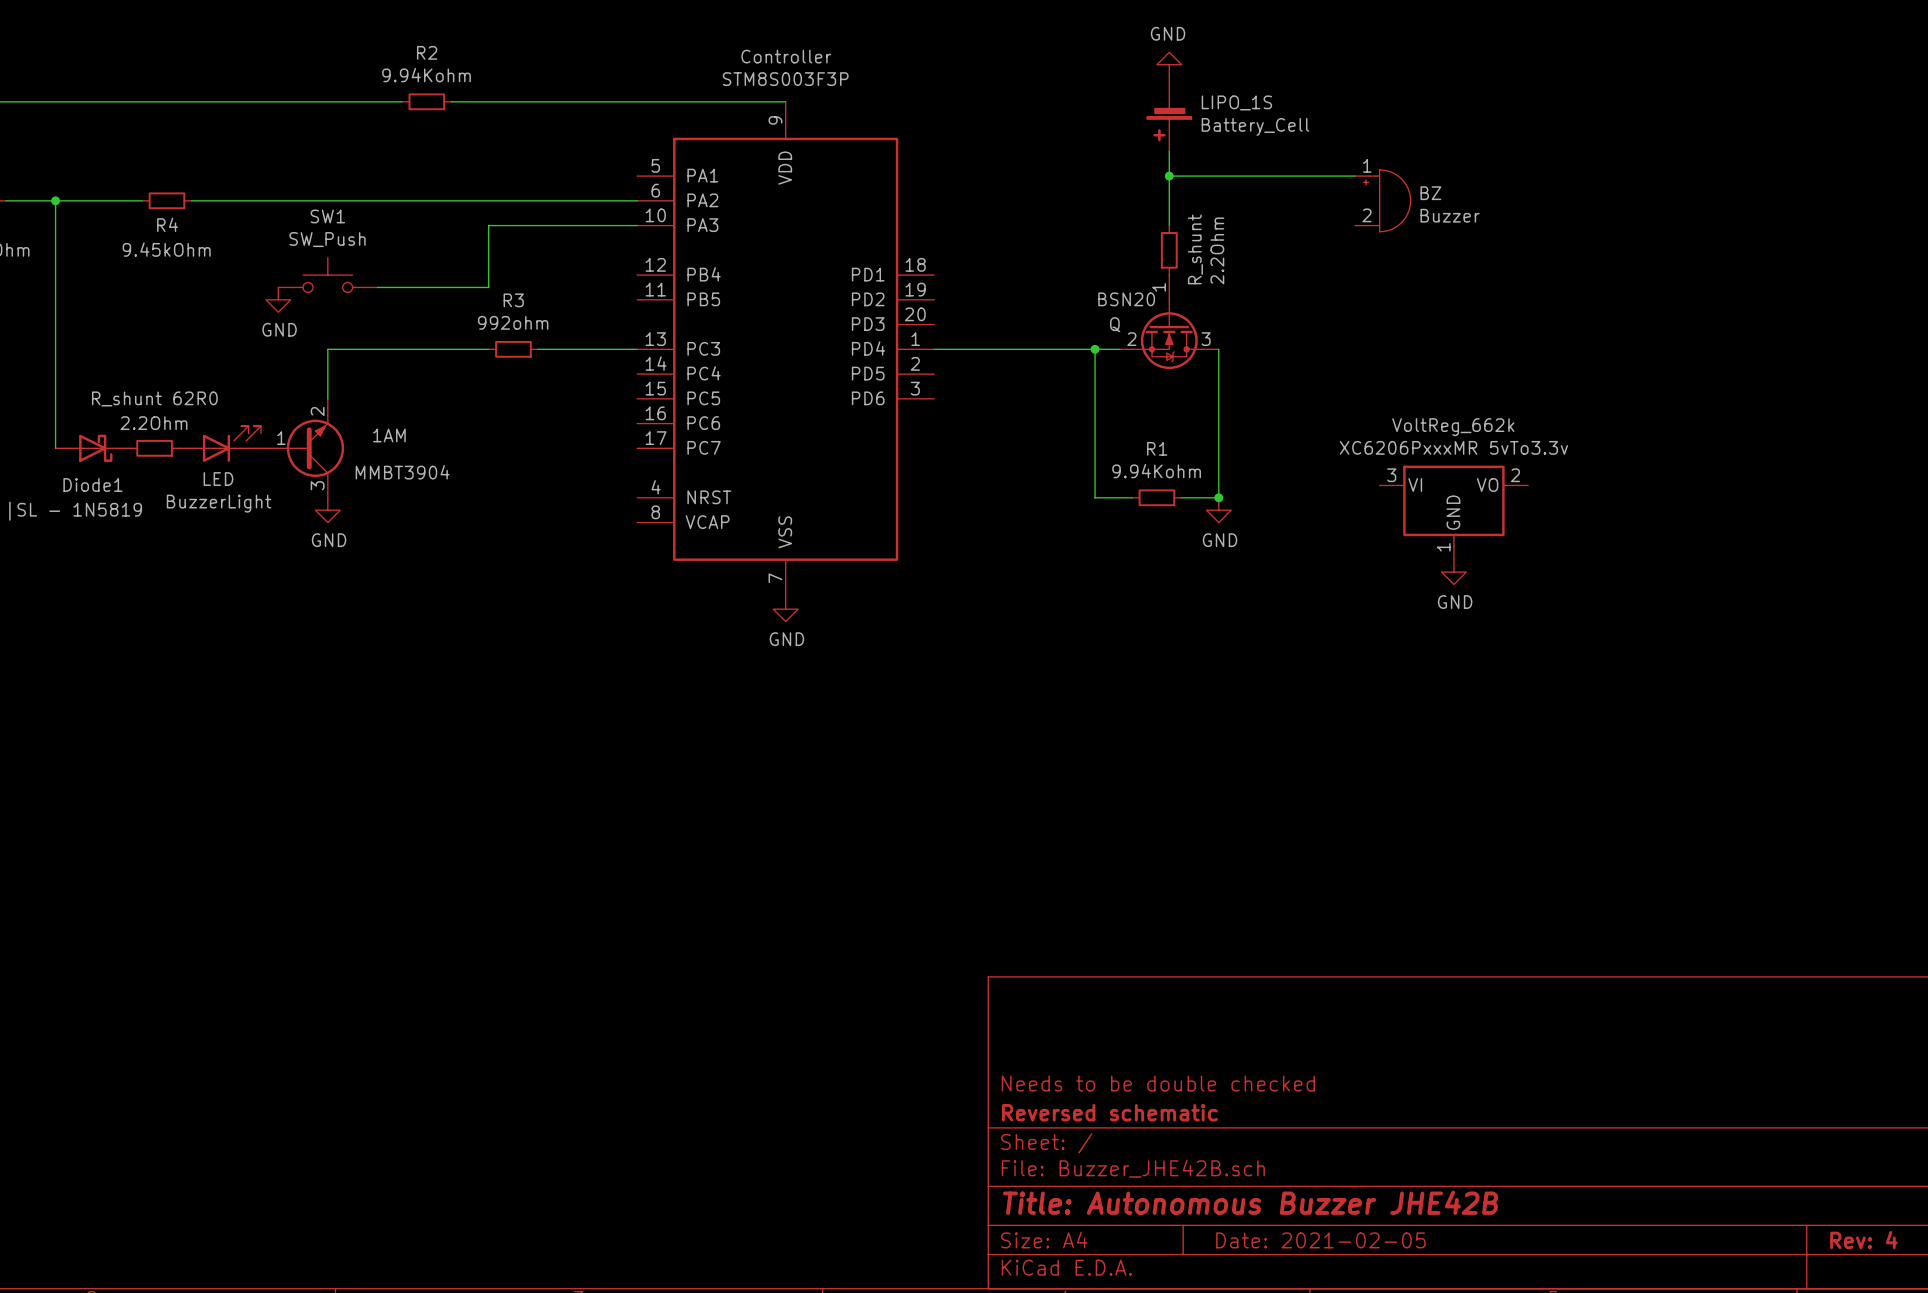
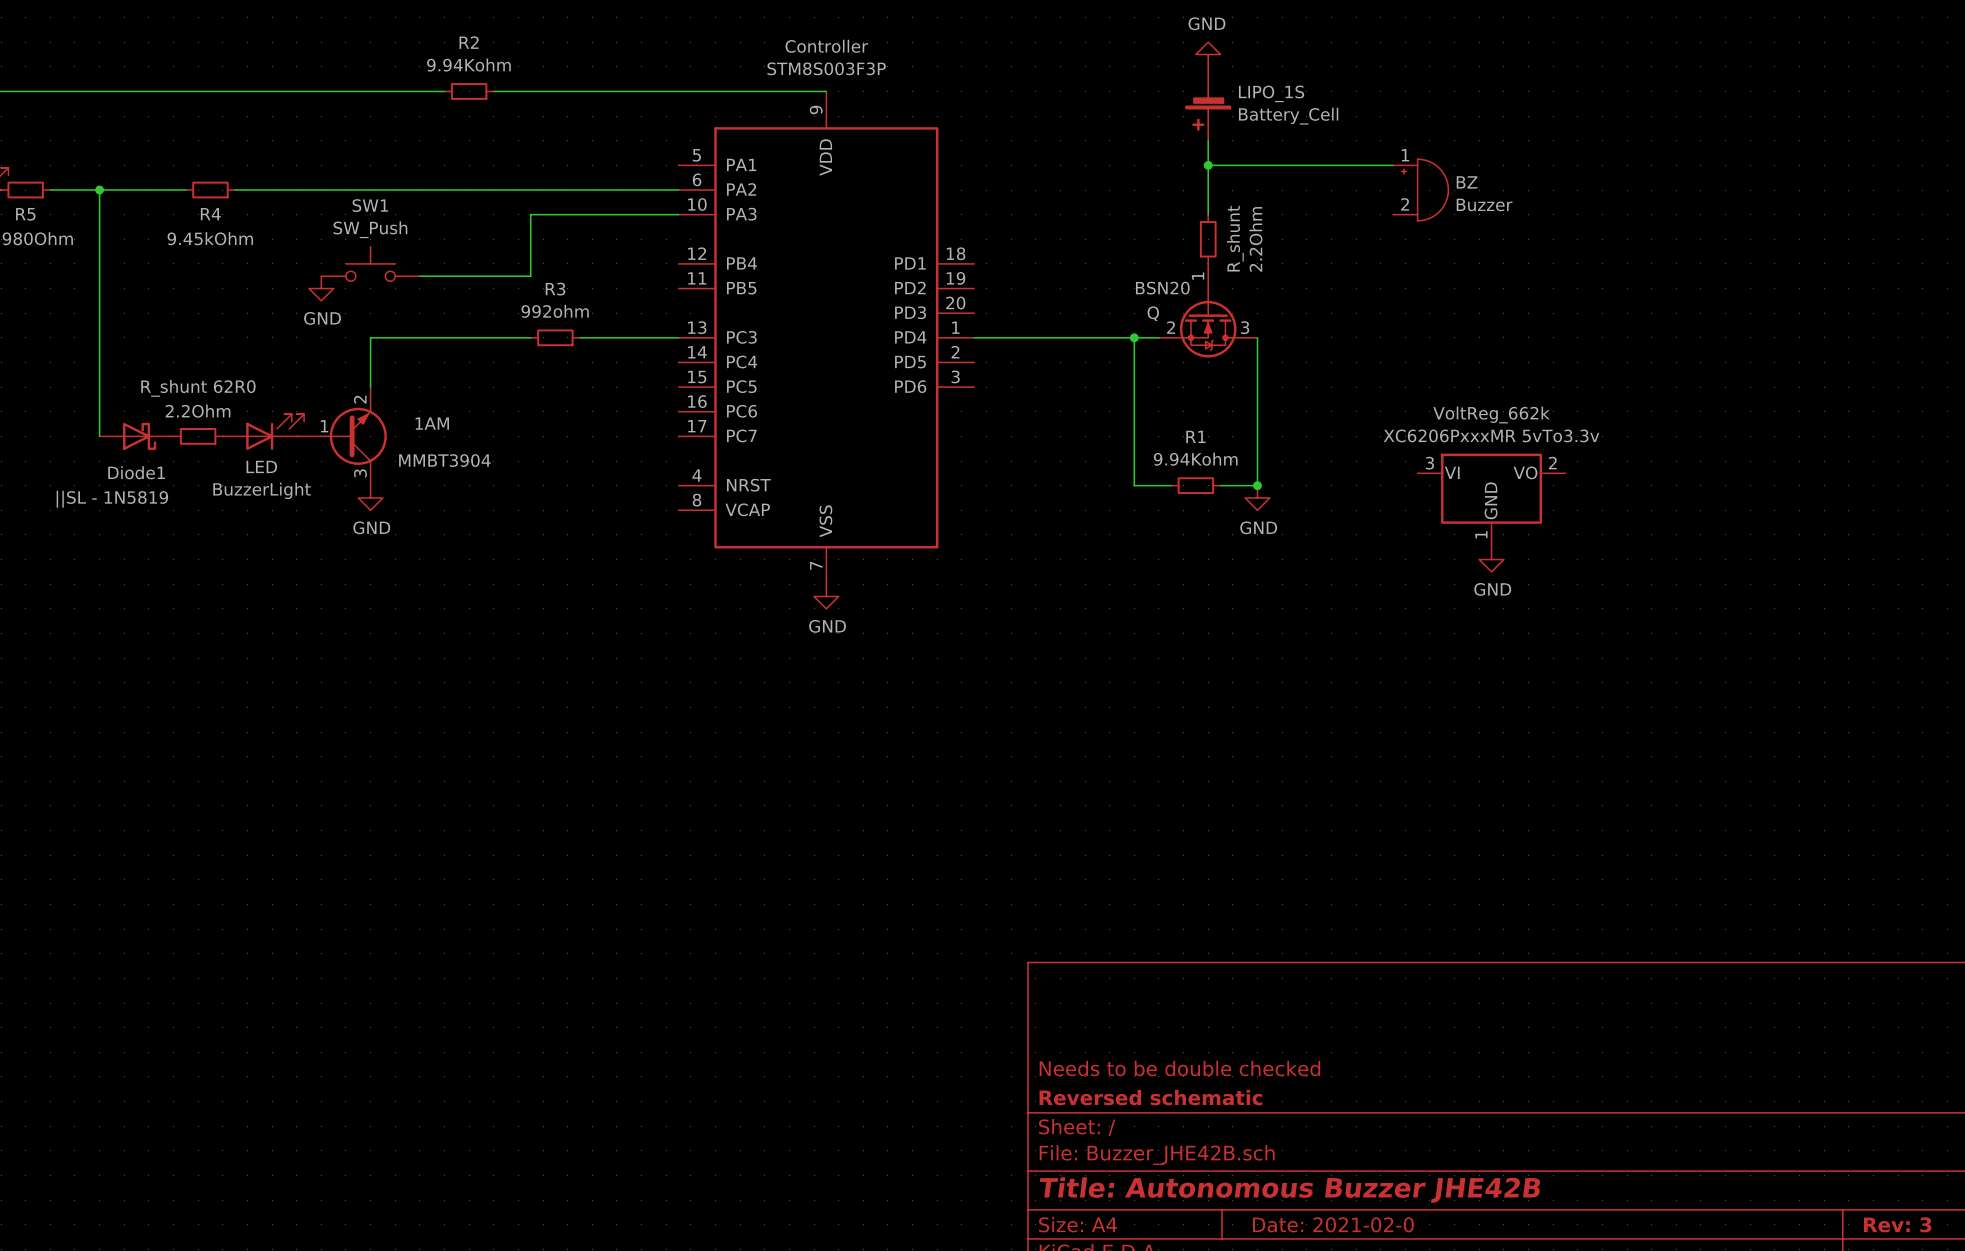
title block: Date: 2021-02-05 (1320, 1240) -> Date: 2021-02-0 (1333, 1224)
title block: Rev: 4 (1864, 1240) -> Rev: 3 (1897, 1224)

